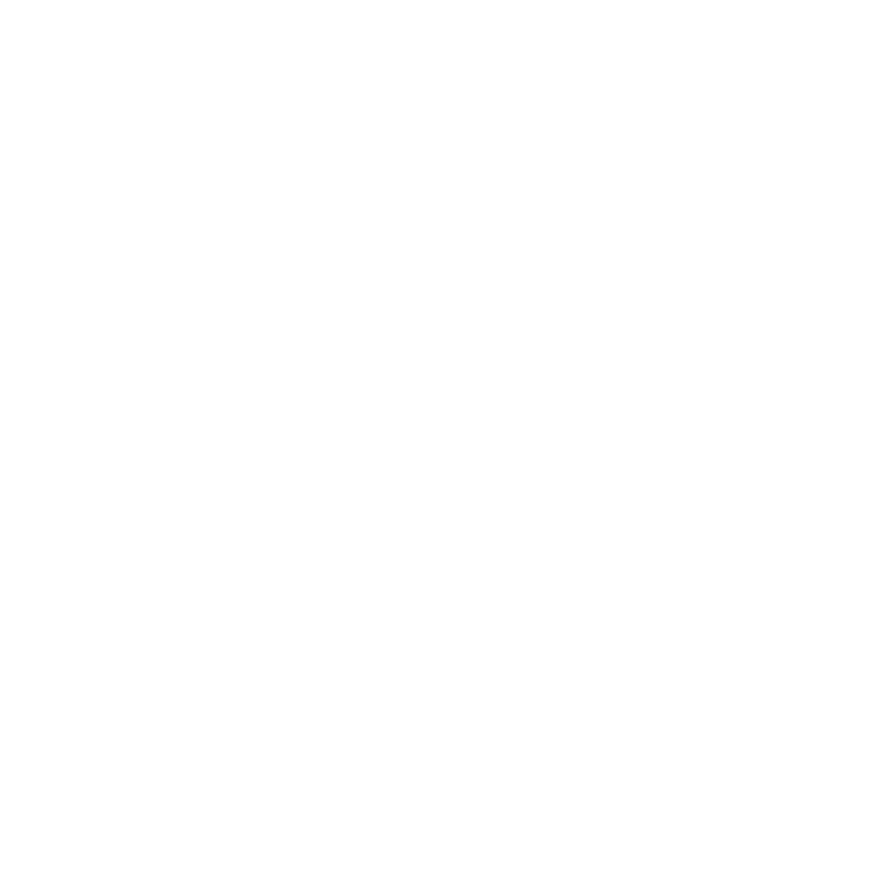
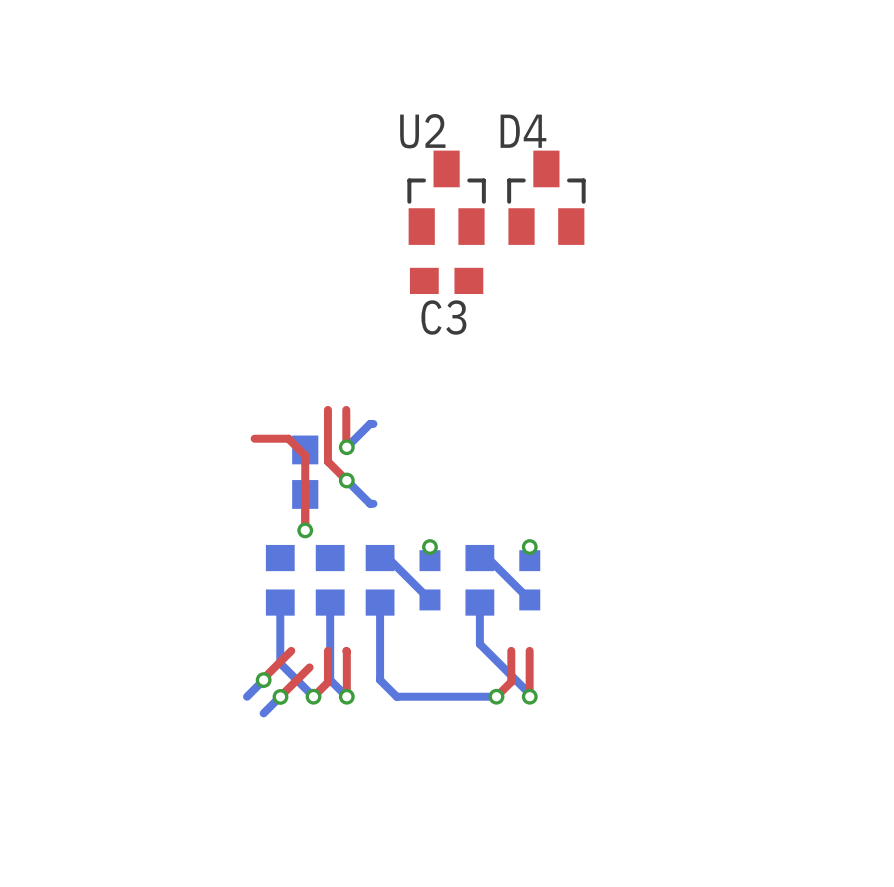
U2: none -> (446, 197)
D4: none -> (546, 197)
C3: none -> (446, 280)
top track: none -> (327, 409) (327, 461) (346, 480)
top track: none -> (346, 409) (346, 447)
bottom track: none -> (373, 423) (370, 423) (346, 447)
top track: none -> (254, 438) (288, 438) (305, 455) (305, 530)
via: none -> (346, 447)
part: none -> (305, 472)
bottom track: none -> (346, 480) (370, 503) (373, 503)
via: none -> (346, 480)
via: none -> (305, 530)
via: none -> (429, 547)
via: none -> (529, 547)
bottom track: none -> (380, 558) (388, 558) (429, 599)
bottom track: none -> (479, 558) (487, 558) (529, 599)
part: none -> (280, 580)
part: none -> (330, 580)
part: none -> (380, 580)
part: none -> (429, 580)
part: none -> (479, 580)
part: none -> (529, 580)
bottom track: none -> (280, 602) (280, 663) (313, 696)
bottom track: none -> (330, 602) (330, 680) (346, 696)
bottom track: none -> (380, 602) (380, 680) (396, 696) (496, 696)
bottom track: none -> (479, 602) (479, 644) (529, 694) (529, 696)
top track: none -> (291, 650) (263, 680)
top track: none -> (327, 650) (327, 682) (313, 696)
top track: none -> (346, 650) (346, 696)
top track: none -> (511, 650) (511, 681) (496, 696)
top track: none -> (529, 650) (529, 696)
top track: none -> (309, 667) (280, 696)
bottom track: none -> (263, 680) (247, 696)
via: none -> (263, 680)
bottom track: none -> (280, 696) (263, 713)
via: none -> (280, 696)
via: none -> (313, 696)
via: none -> (346, 696)
via: none -> (496, 696)
via: none -> (529, 696)

